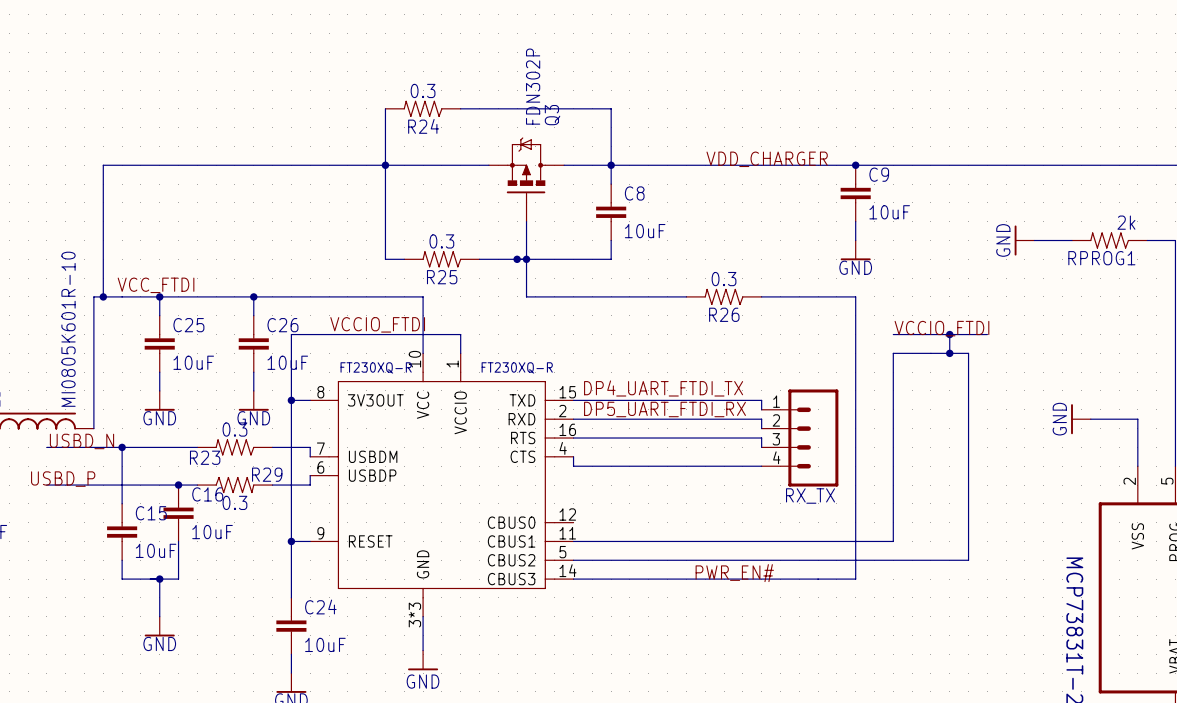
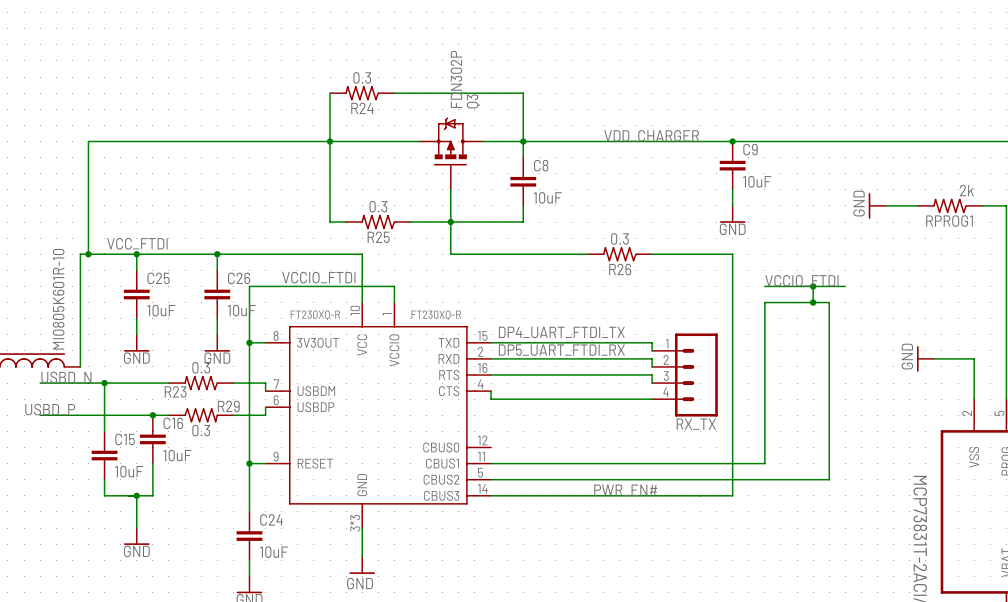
junction: (517, 259) -> none

